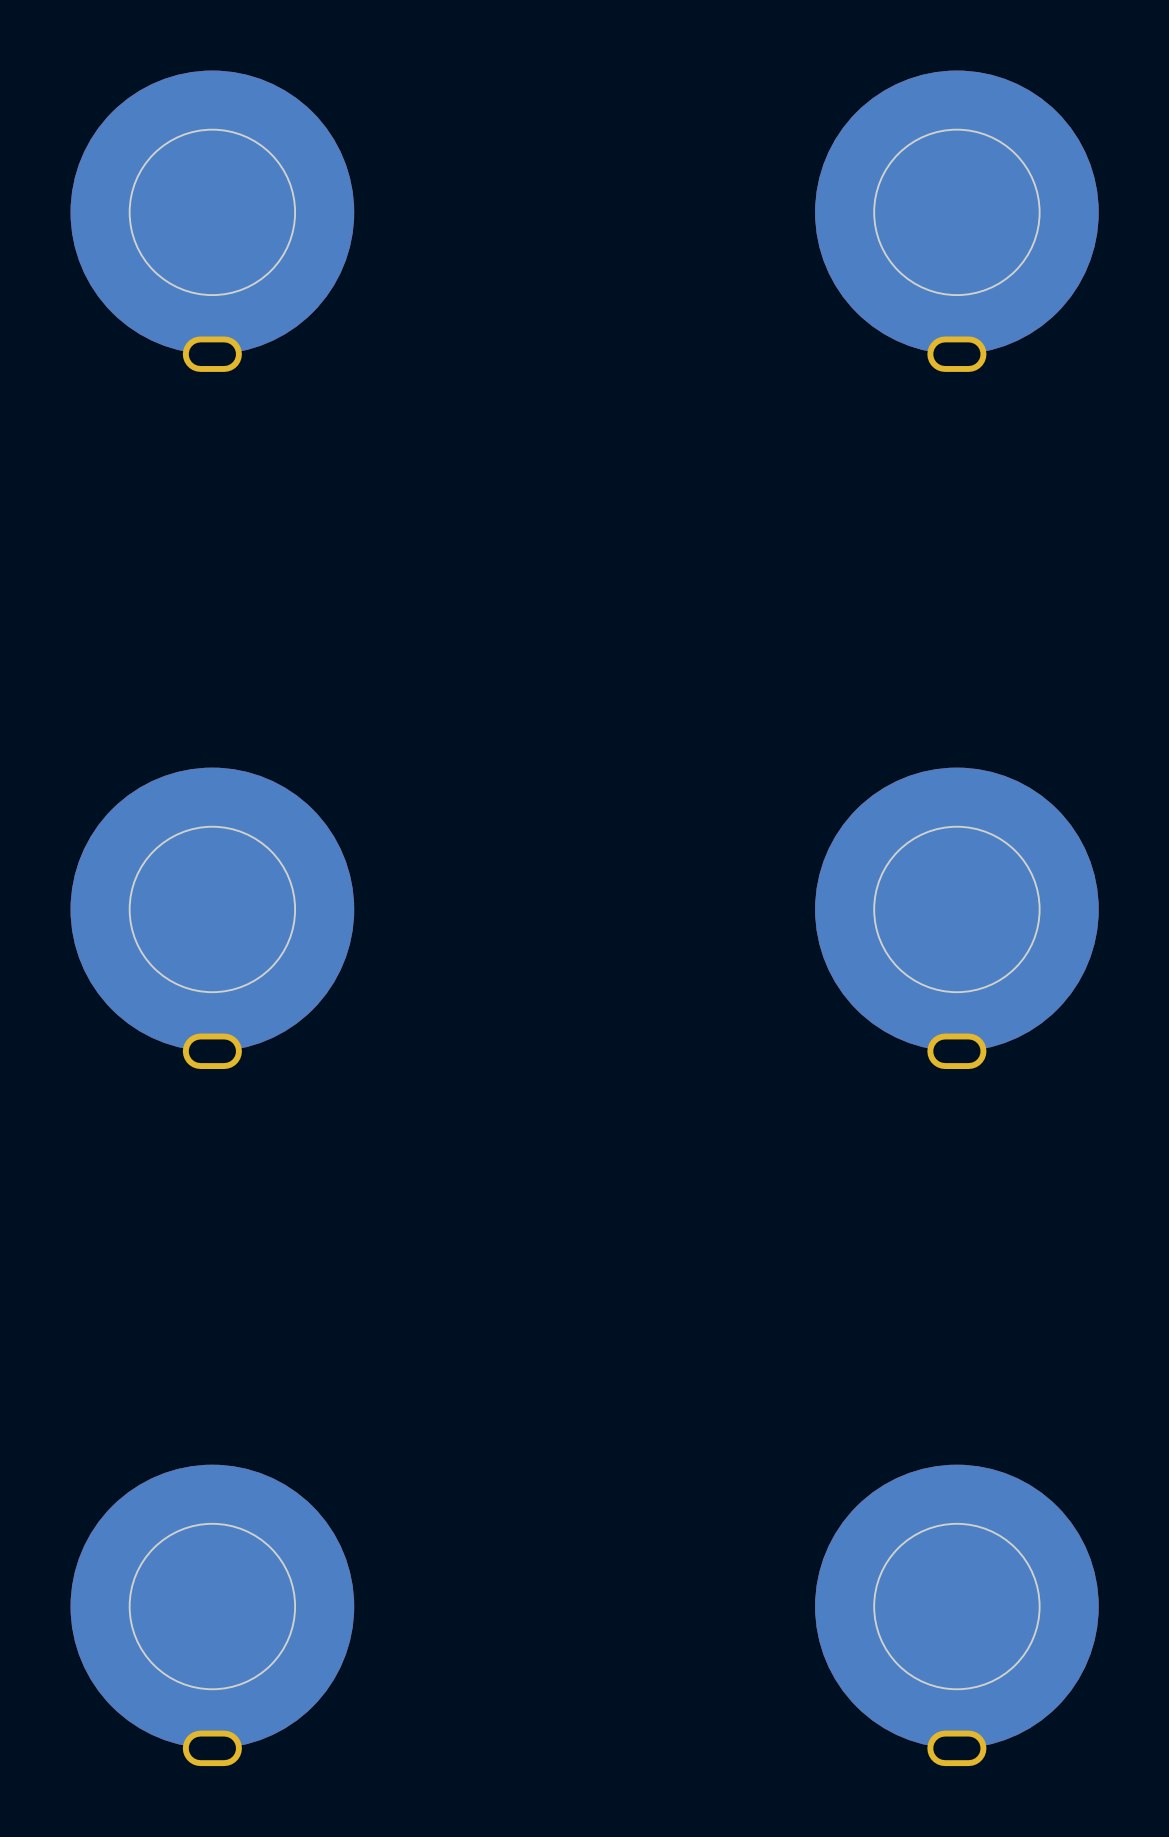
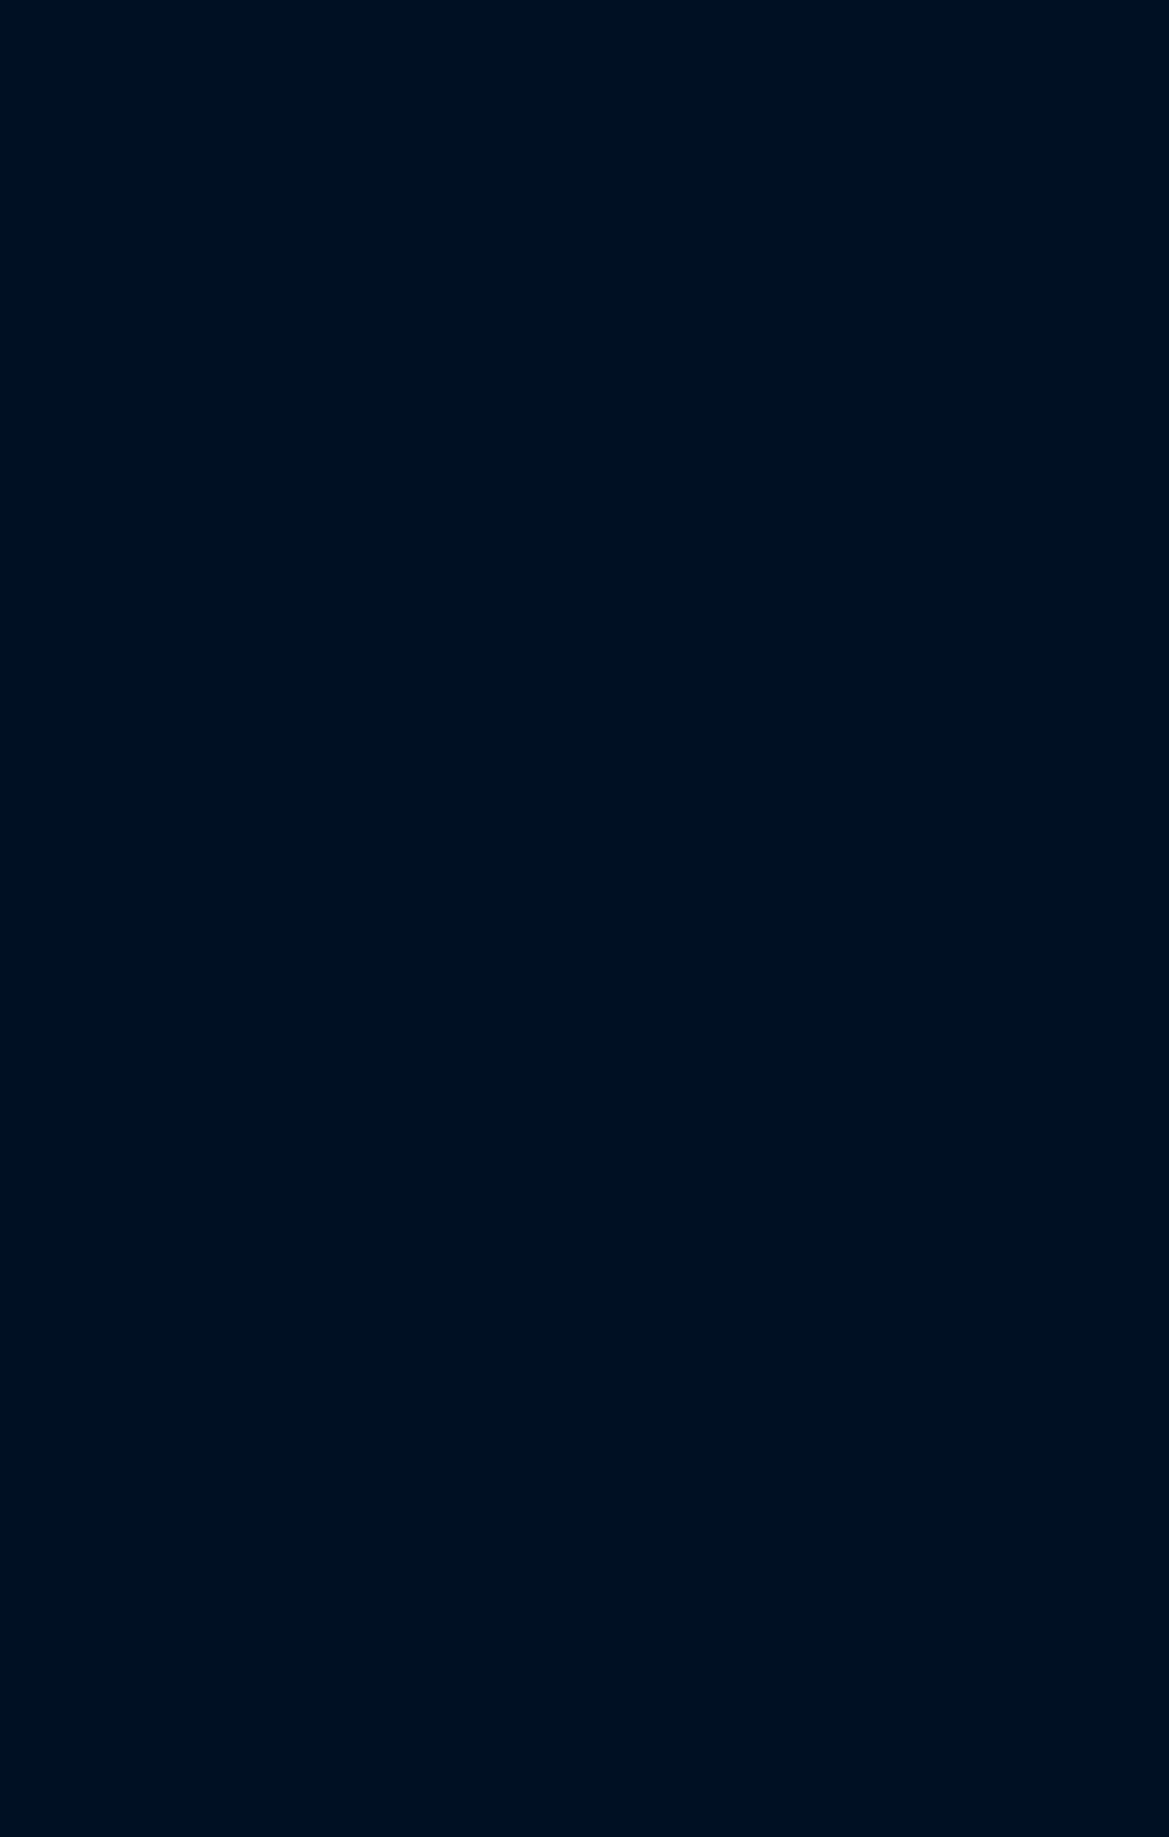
part: (212, 221) -> none
part: (956, 221) -> none
part: (212, 918) -> none
part: (956, 918) -> none
part: (212, 1615) -> none
part: (956, 1615) -> none

